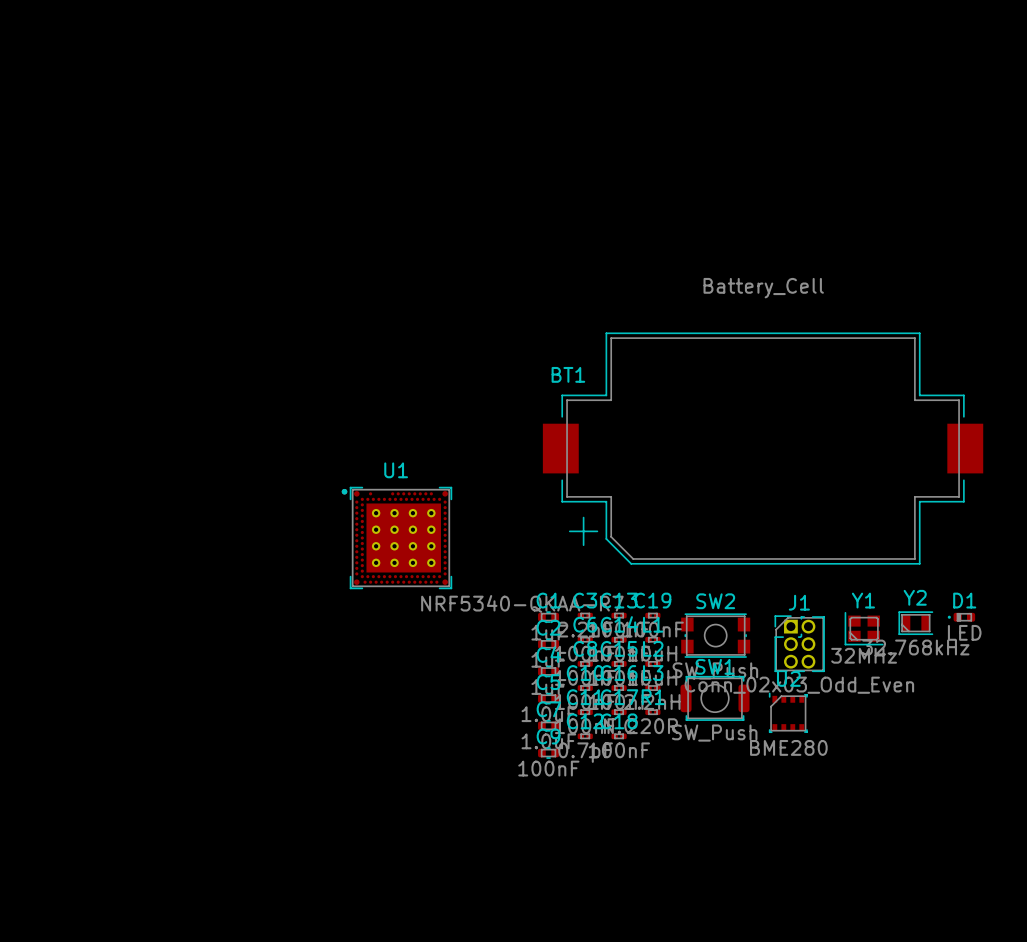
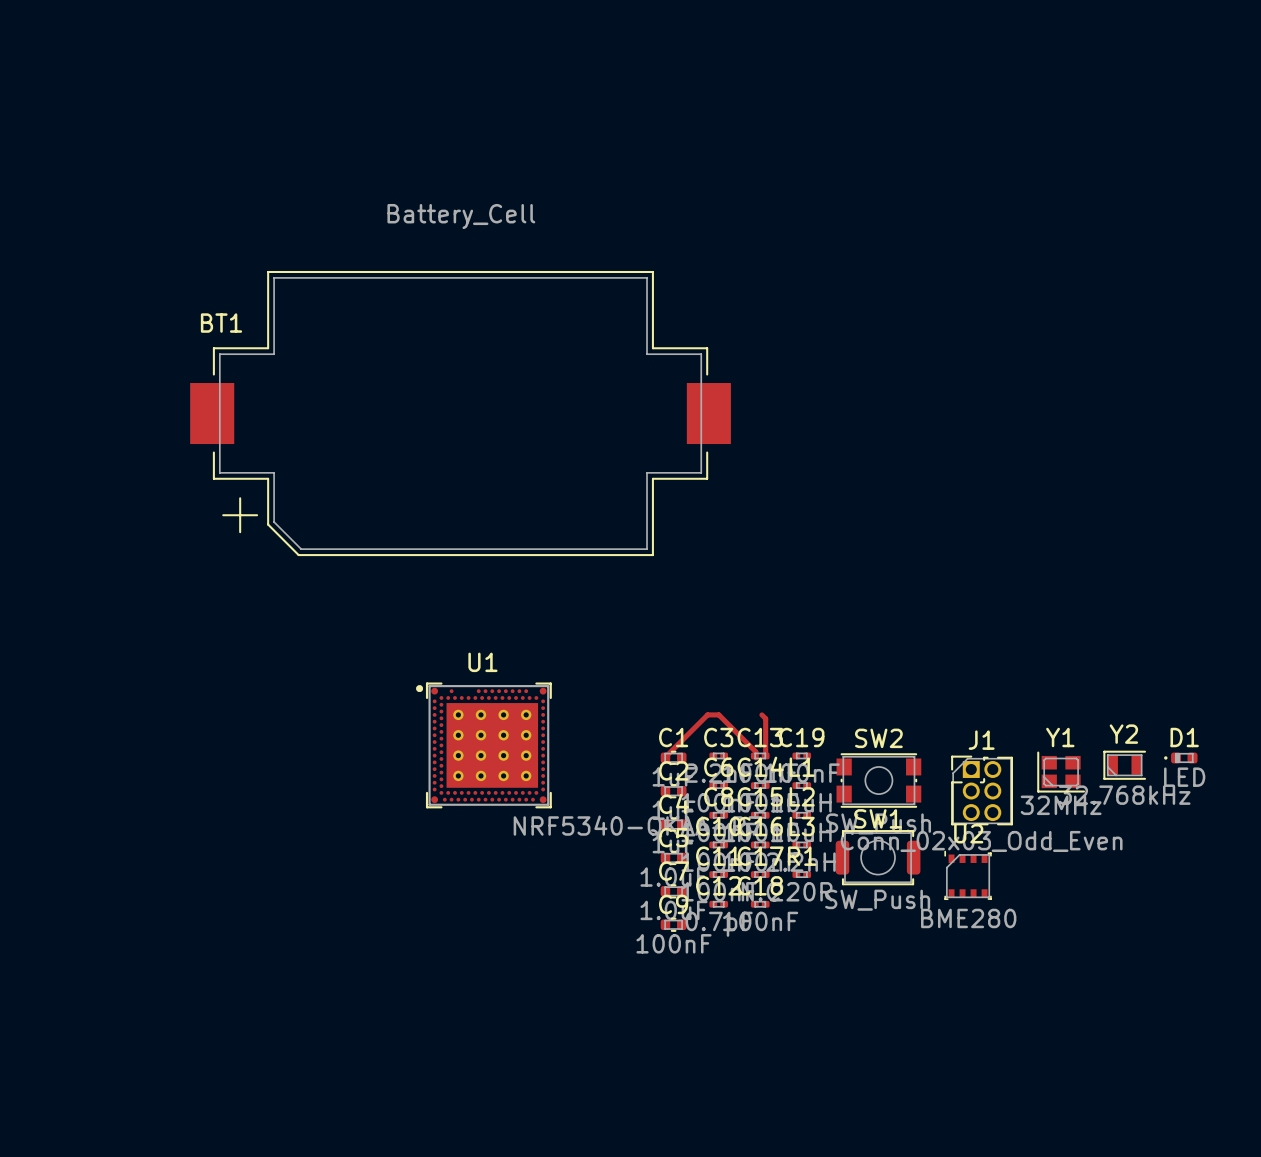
BT1 position: (763, 448) -> (460, 413)
U1 position: (397, 537) -> (484, 745)
track: none -> (761, 714) (765, 718) (765, 755)
track: none -> (665, 757) (707, 714) (718, 714) (755, 751) (755, 757)

